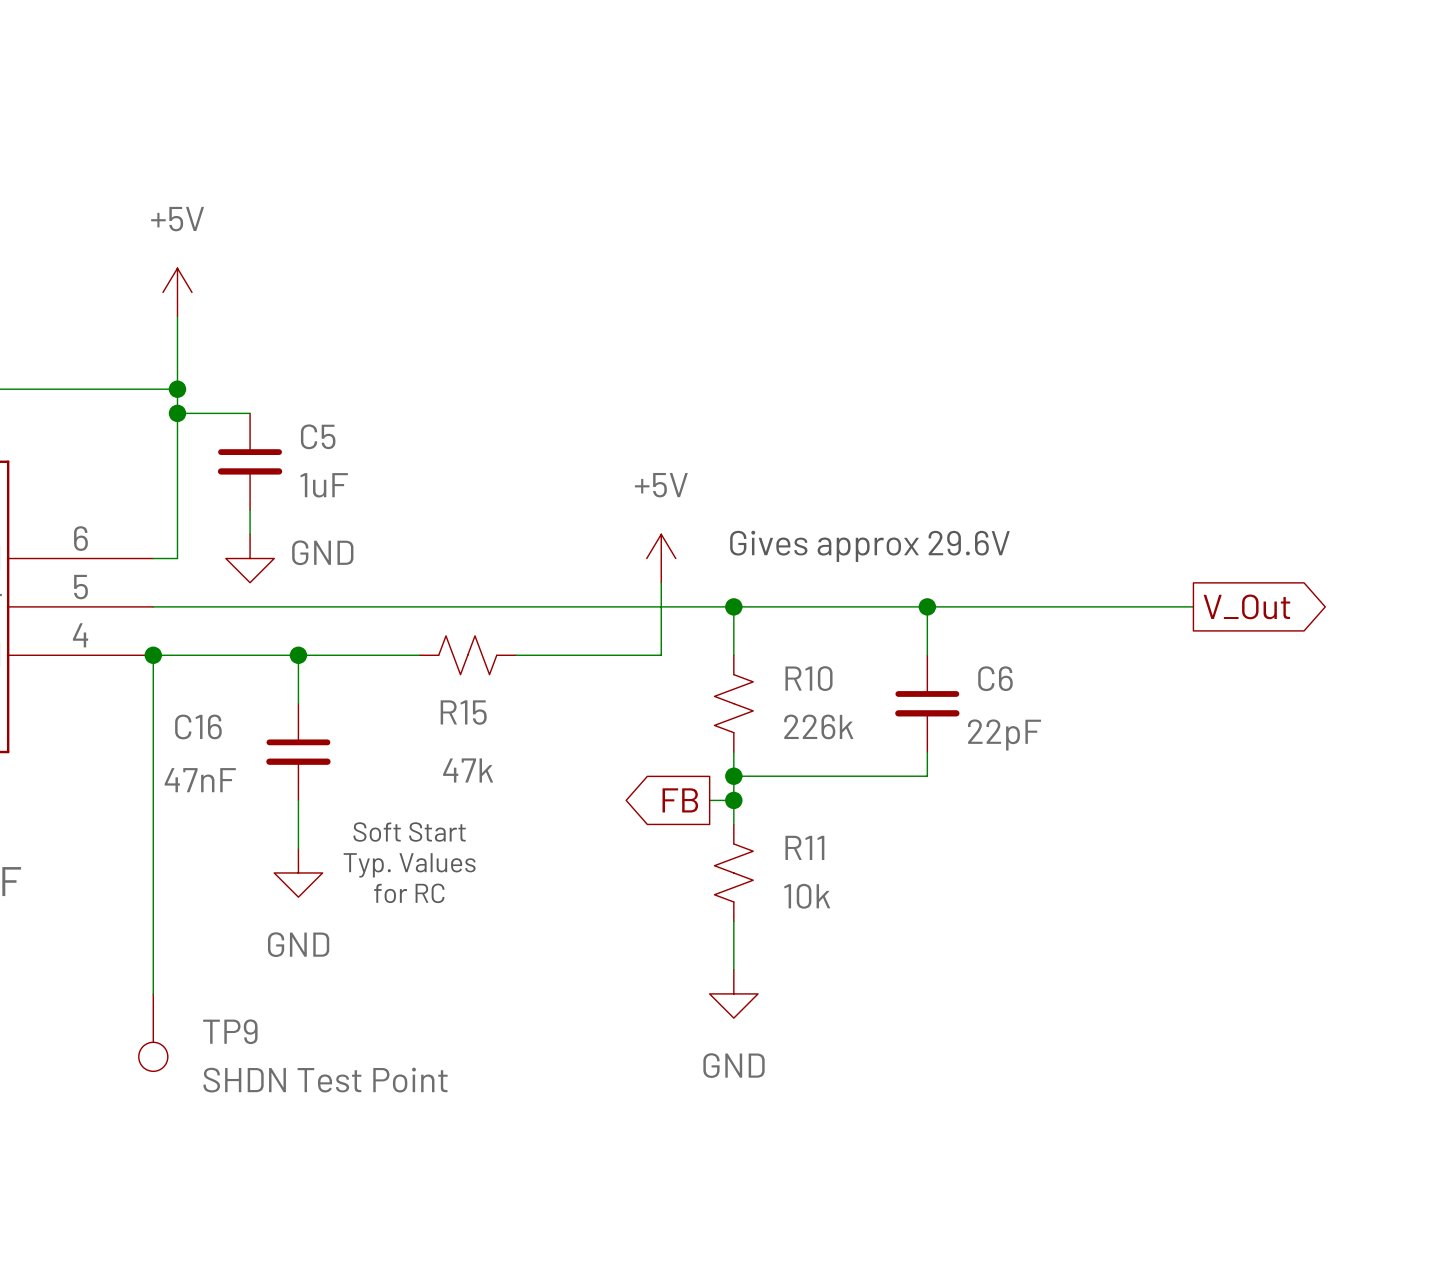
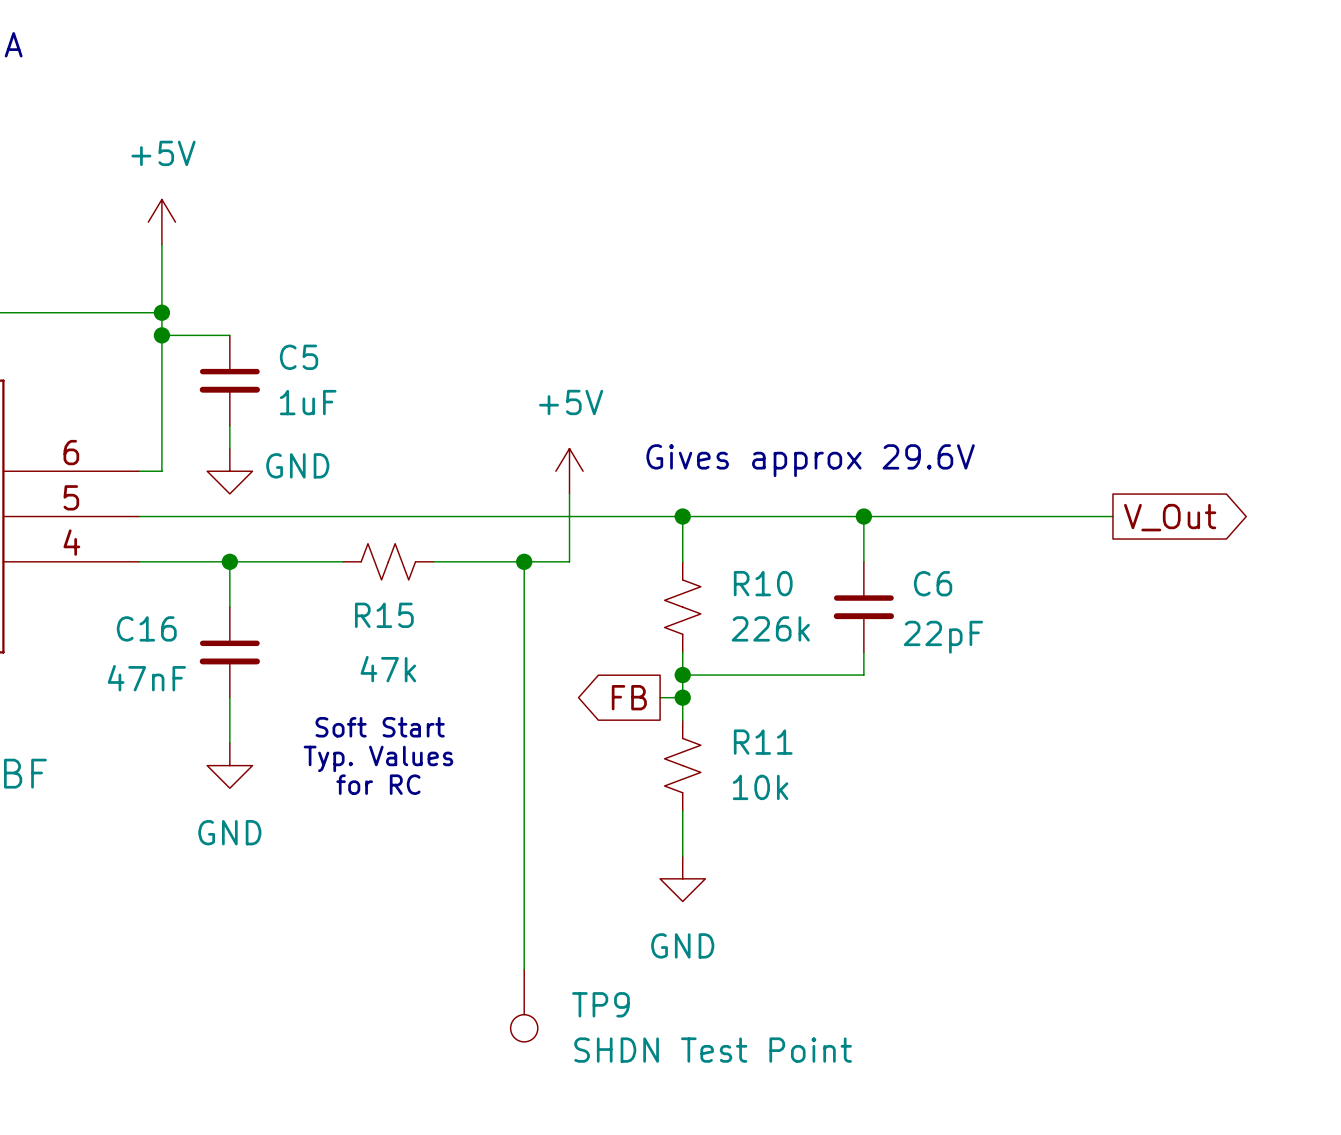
power symbol position: +5V (661, 558) -> +5V (569, 471)
wire: (661, 582) (661, 655) (612, 655) -> (569, 493) (569, 561)
wire: (153, 655) (153, 993) -> none
junction: (153, 655) -> none
junction: none -> (229, 561)
wire: (298, 655) (298, 703) -> (229, 561) (229, 607)
junction: (298, 655) -> none
wire: (370, 655) (419, 655) -> (433, 561) (478, 561)
R15 position: (467, 655) -> (388, 561)
wire: none -> (524, 561) (524, 969)
junction: none -> (524, 561)
C16 position: (298, 752) -> (229, 652)
wire: (298, 800) (298, 848) -> (229, 697) (229, 742)
power symbol position: GND (298, 872) -> GND (229, 765)
TP9 position: (153, 1032) -> (524, 1005)

